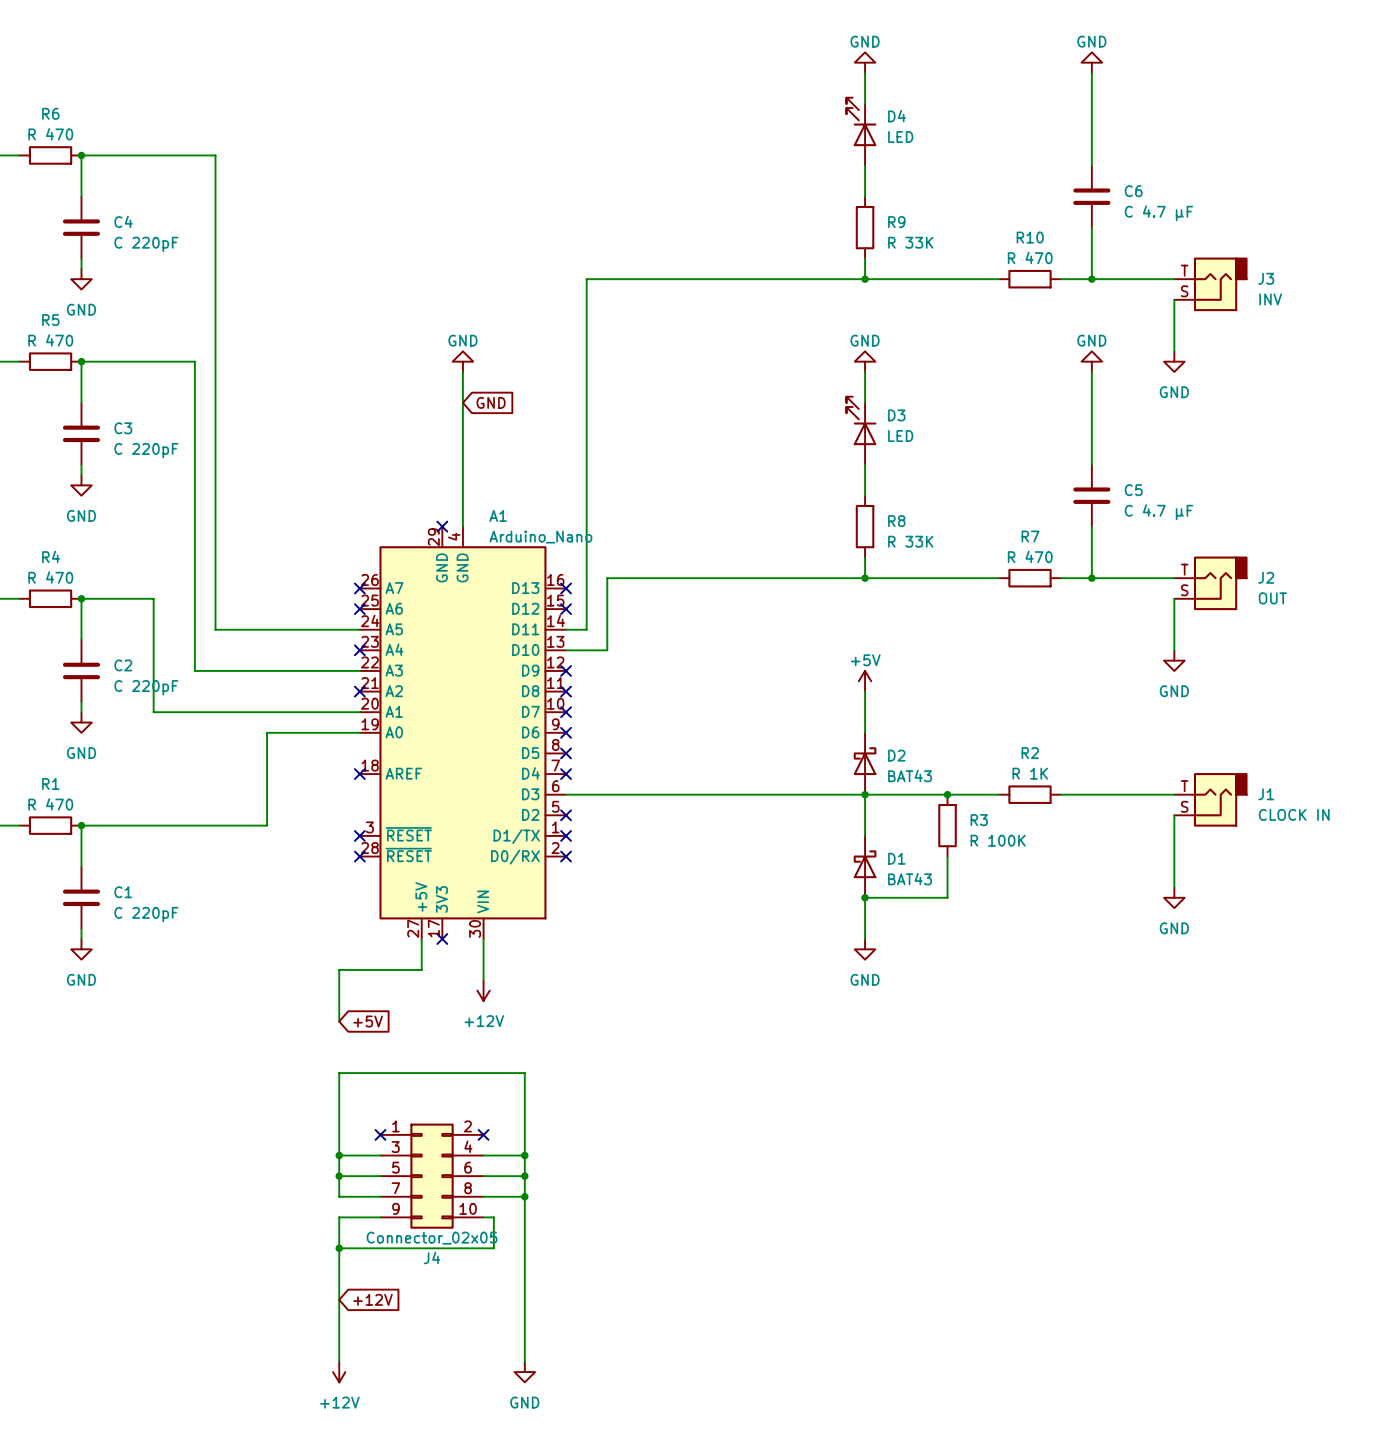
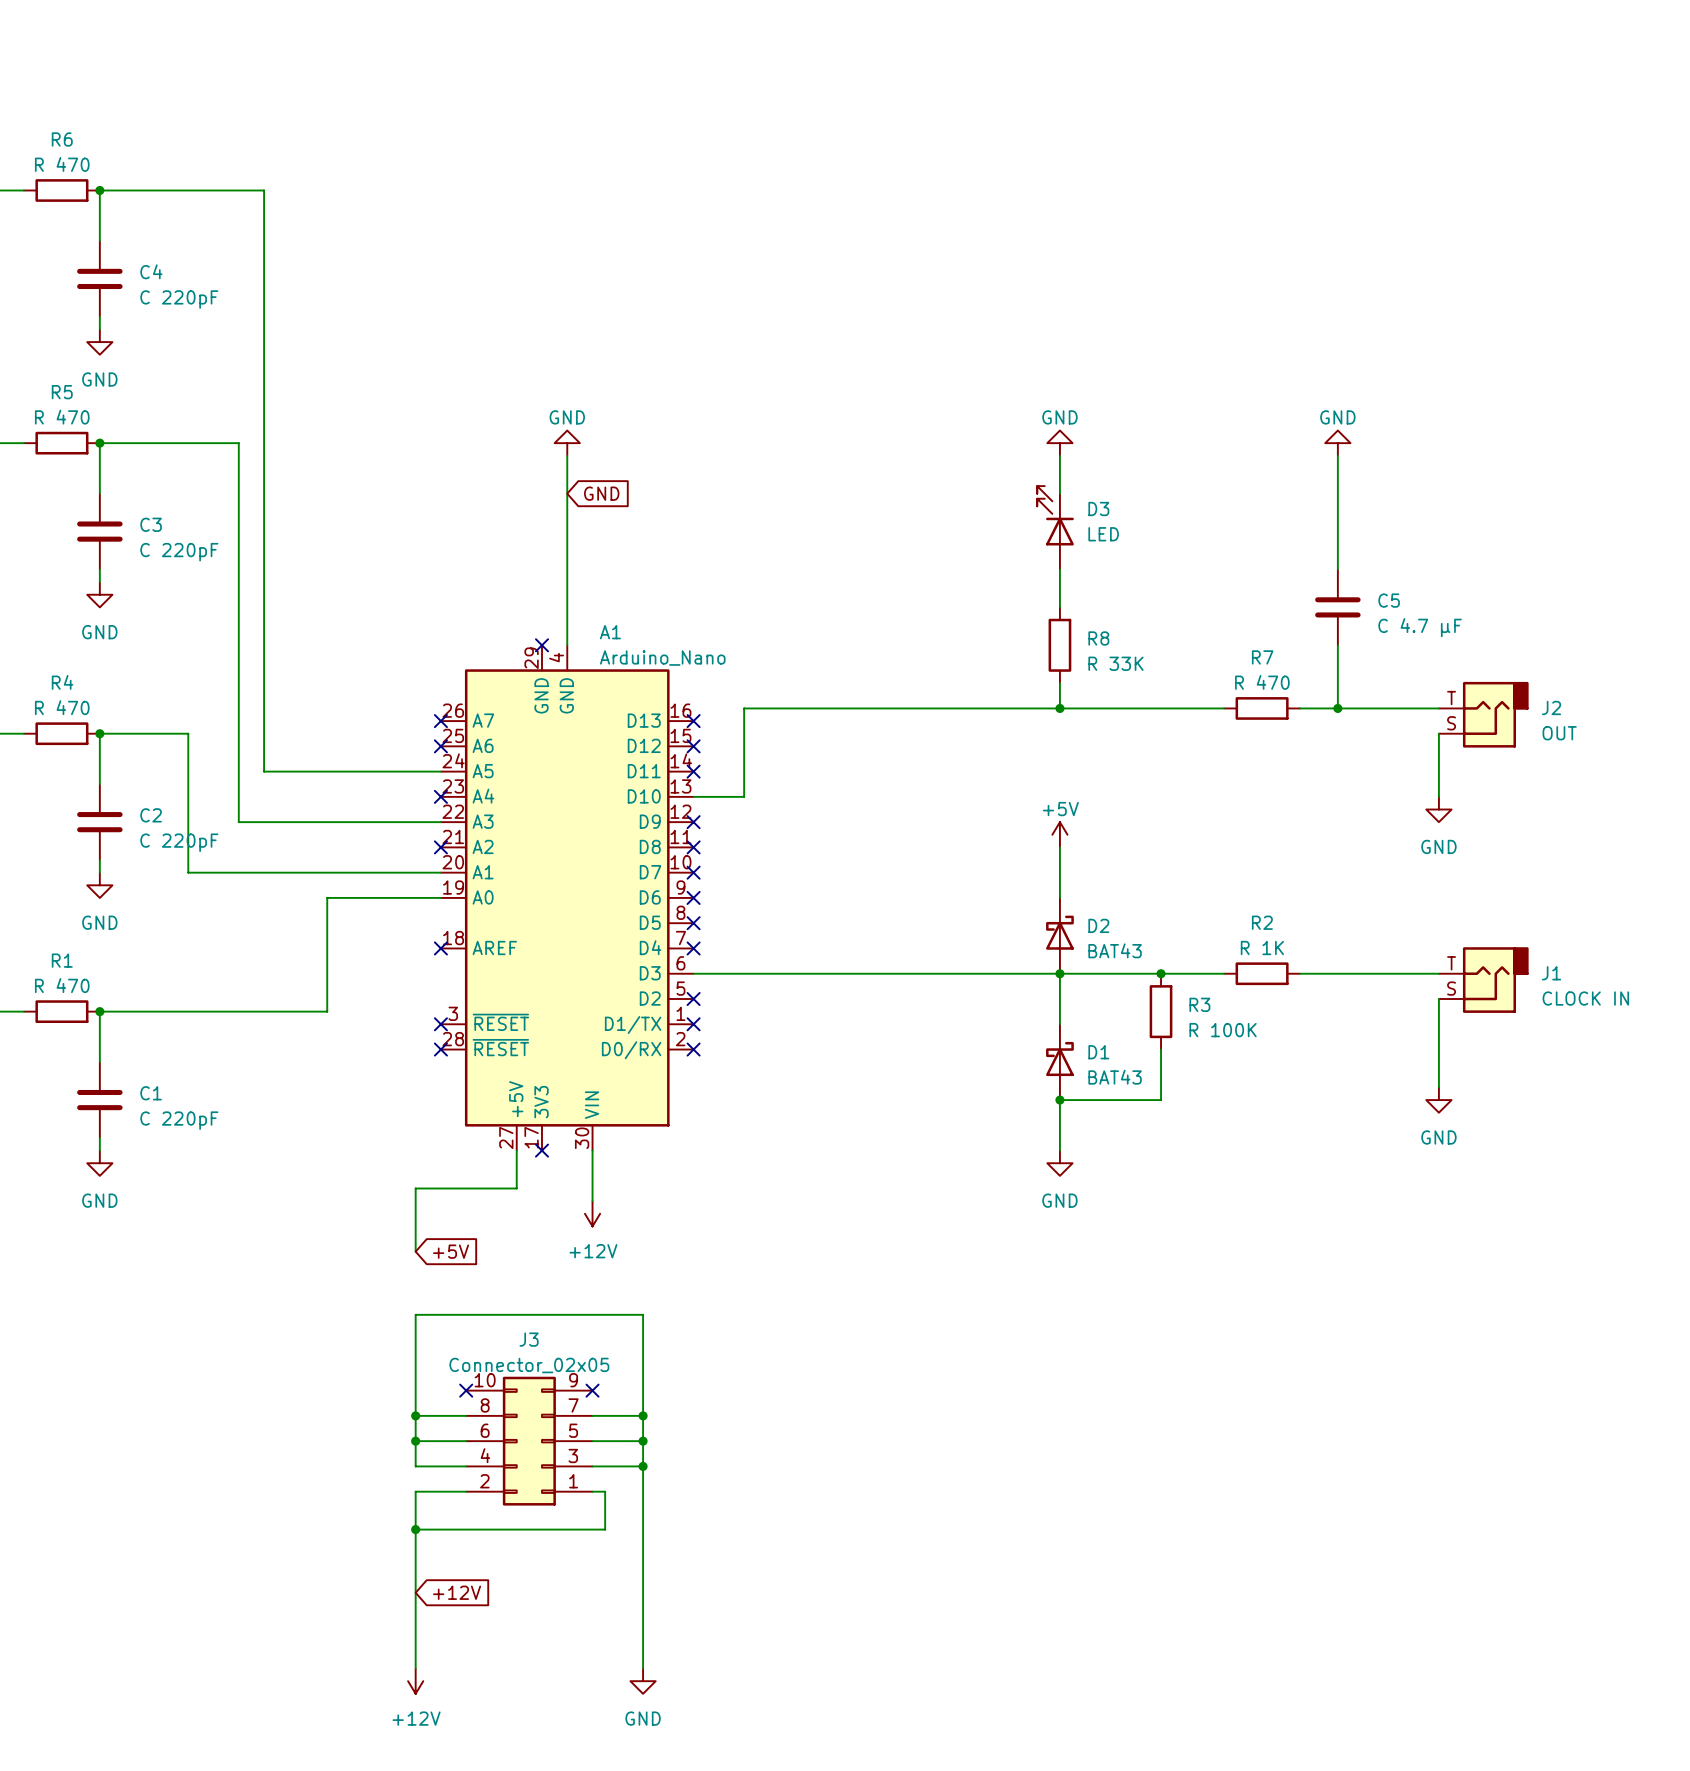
power symbol: GND (865, 62) -> none
power symbol: GND (1091, 62) -> none
wire: (865, 72) (865, 103) -> none
wire: (1091, 72) (1091, 165) -> none
D4: LED (861, 131) -> none
wire: (865, 165) (865, 196) -> none
C6: C 4.7 µF (1091, 196) -> none
R9: R 33K (865, 227) -> none
wire: (1091, 227) (1091, 279) -> none
J3 symbol: [1174, 257, 1248, 312] -> [466, 1376, 593, 1506]
wire: (865, 258) (865, 279) -> none
J3 name position: J3 (1266, 278) -> J3 (529, 1339)
junction: (865, 279) -> none
wire: (999, 279) (586, 279) (586, 629) (566, 629) -> none
R10: R 470 (1030, 279) -> none
wire: (1060, 279) (1174, 279) -> none
junction: (1091, 279) -> none
wire: (1174, 299) (1174, 351) -> none
J3 value: INV (1270, 299) -> Connector_02x05 (529, 1365)
power symbol: GND (1174, 361) -> none
no-connect mark: none -> (693, 771)
J4: Connector_02x05 (432, 1176) -> none

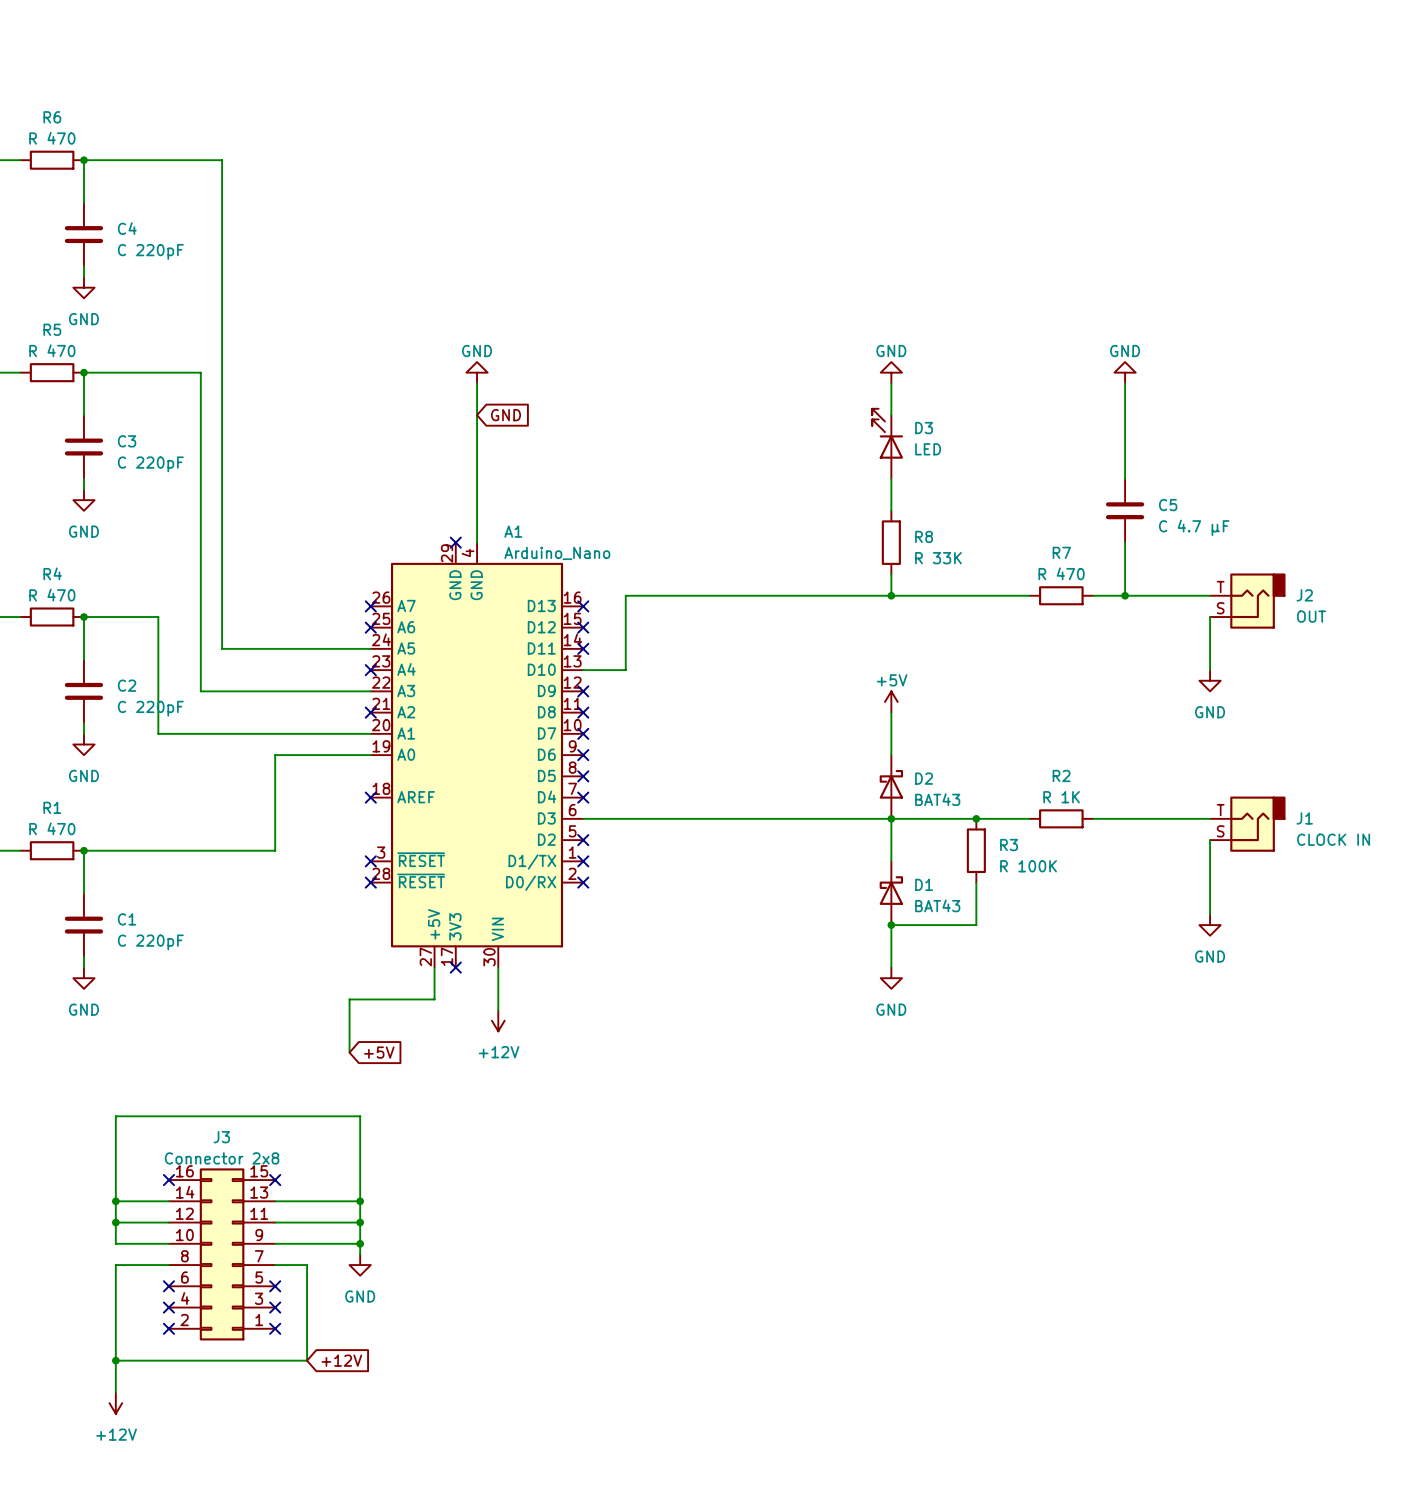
J3 name position: J3 (529, 1339) -> J3 (221, 1137)
J3 value: Connector_02x05 (529, 1365) -> Connector 2x8 (222, 1158)
J3 symbol: [466, 1376, 593, 1506] -> [168, 1168, 276, 1341]
no-connect mark: (466, 1390) -> none
no-connect mark: (592, 1390) -> none
no-connect mark: none -> (168, 1180)
no-connect mark: none -> (275, 1180)
wire: (415, 1415) (466, 1415) -> none
junction: (415, 1415) -> none
wire: (592, 1415) (643, 1415) -> none
junction: (643, 1415) -> none
wire: none -> (115, 1201) (168, 1201)
junction: none -> (115, 1201)
wire: none -> (275, 1201) (360, 1201)
junction: none -> (360, 1201)
wire: (415, 1441) (466, 1441) -> none
junction: (415, 1441) -> none
wire: (592, 1441) (643, 1441) -> none
junction: (643, 1441) -> none
wire: none -> (115, 1222) (168, 1222)
junction: none -> (115, 1222)
wire: none -> (275, 1222) (360, 1222)
junction: none -> (360, 1222)
wire: (466, 1466) (415, 1466) (415, 1314) (643, 1314) (643, 1668) -> none
wire: (592, 1466) (643, 1466) -> none
junction: (643, 1466) -> none
wire: none -> (168, 1243) (115, 1243) (115, 1116) (360, 1116) (360, 1254)
wire: none -> (275, 1243) (360, 1243)
junction: none -> (360, 1243)
wire: (466, 1491) (415, 1491) (415, 1668) -> none
wire: (592, 1491) (605, 1491) (605, 1529) (415, 1529) -> none
wire: none -> (168, 1265) (115, 1265) (115, 1392)
wire: none -> (275, 1265) (307, 1265) (307, 1360) (115, 1360)
power symbol: none -> GND (360, 1265)
no-connect mark: none -> (168, 1286)
no-connect mark: none -> (275, 1286)
junction: (415, 1529) -> none
no-connect mark: none -> (168, 1307)
no-connect mark: none -> (275, 1307)
no-connect mark: none -> (168, 1328)
no-connect mark: none -> (275, 1328)
global label position: +12V (457, 1592) -> +12V (341, 1360)
junction: none -> (115, 1360)
power symbol: none -> +12V (115, 1403)
power symbol: +12V (415, 1681) -> none
power symbol: GND (643, 1681) -> none

